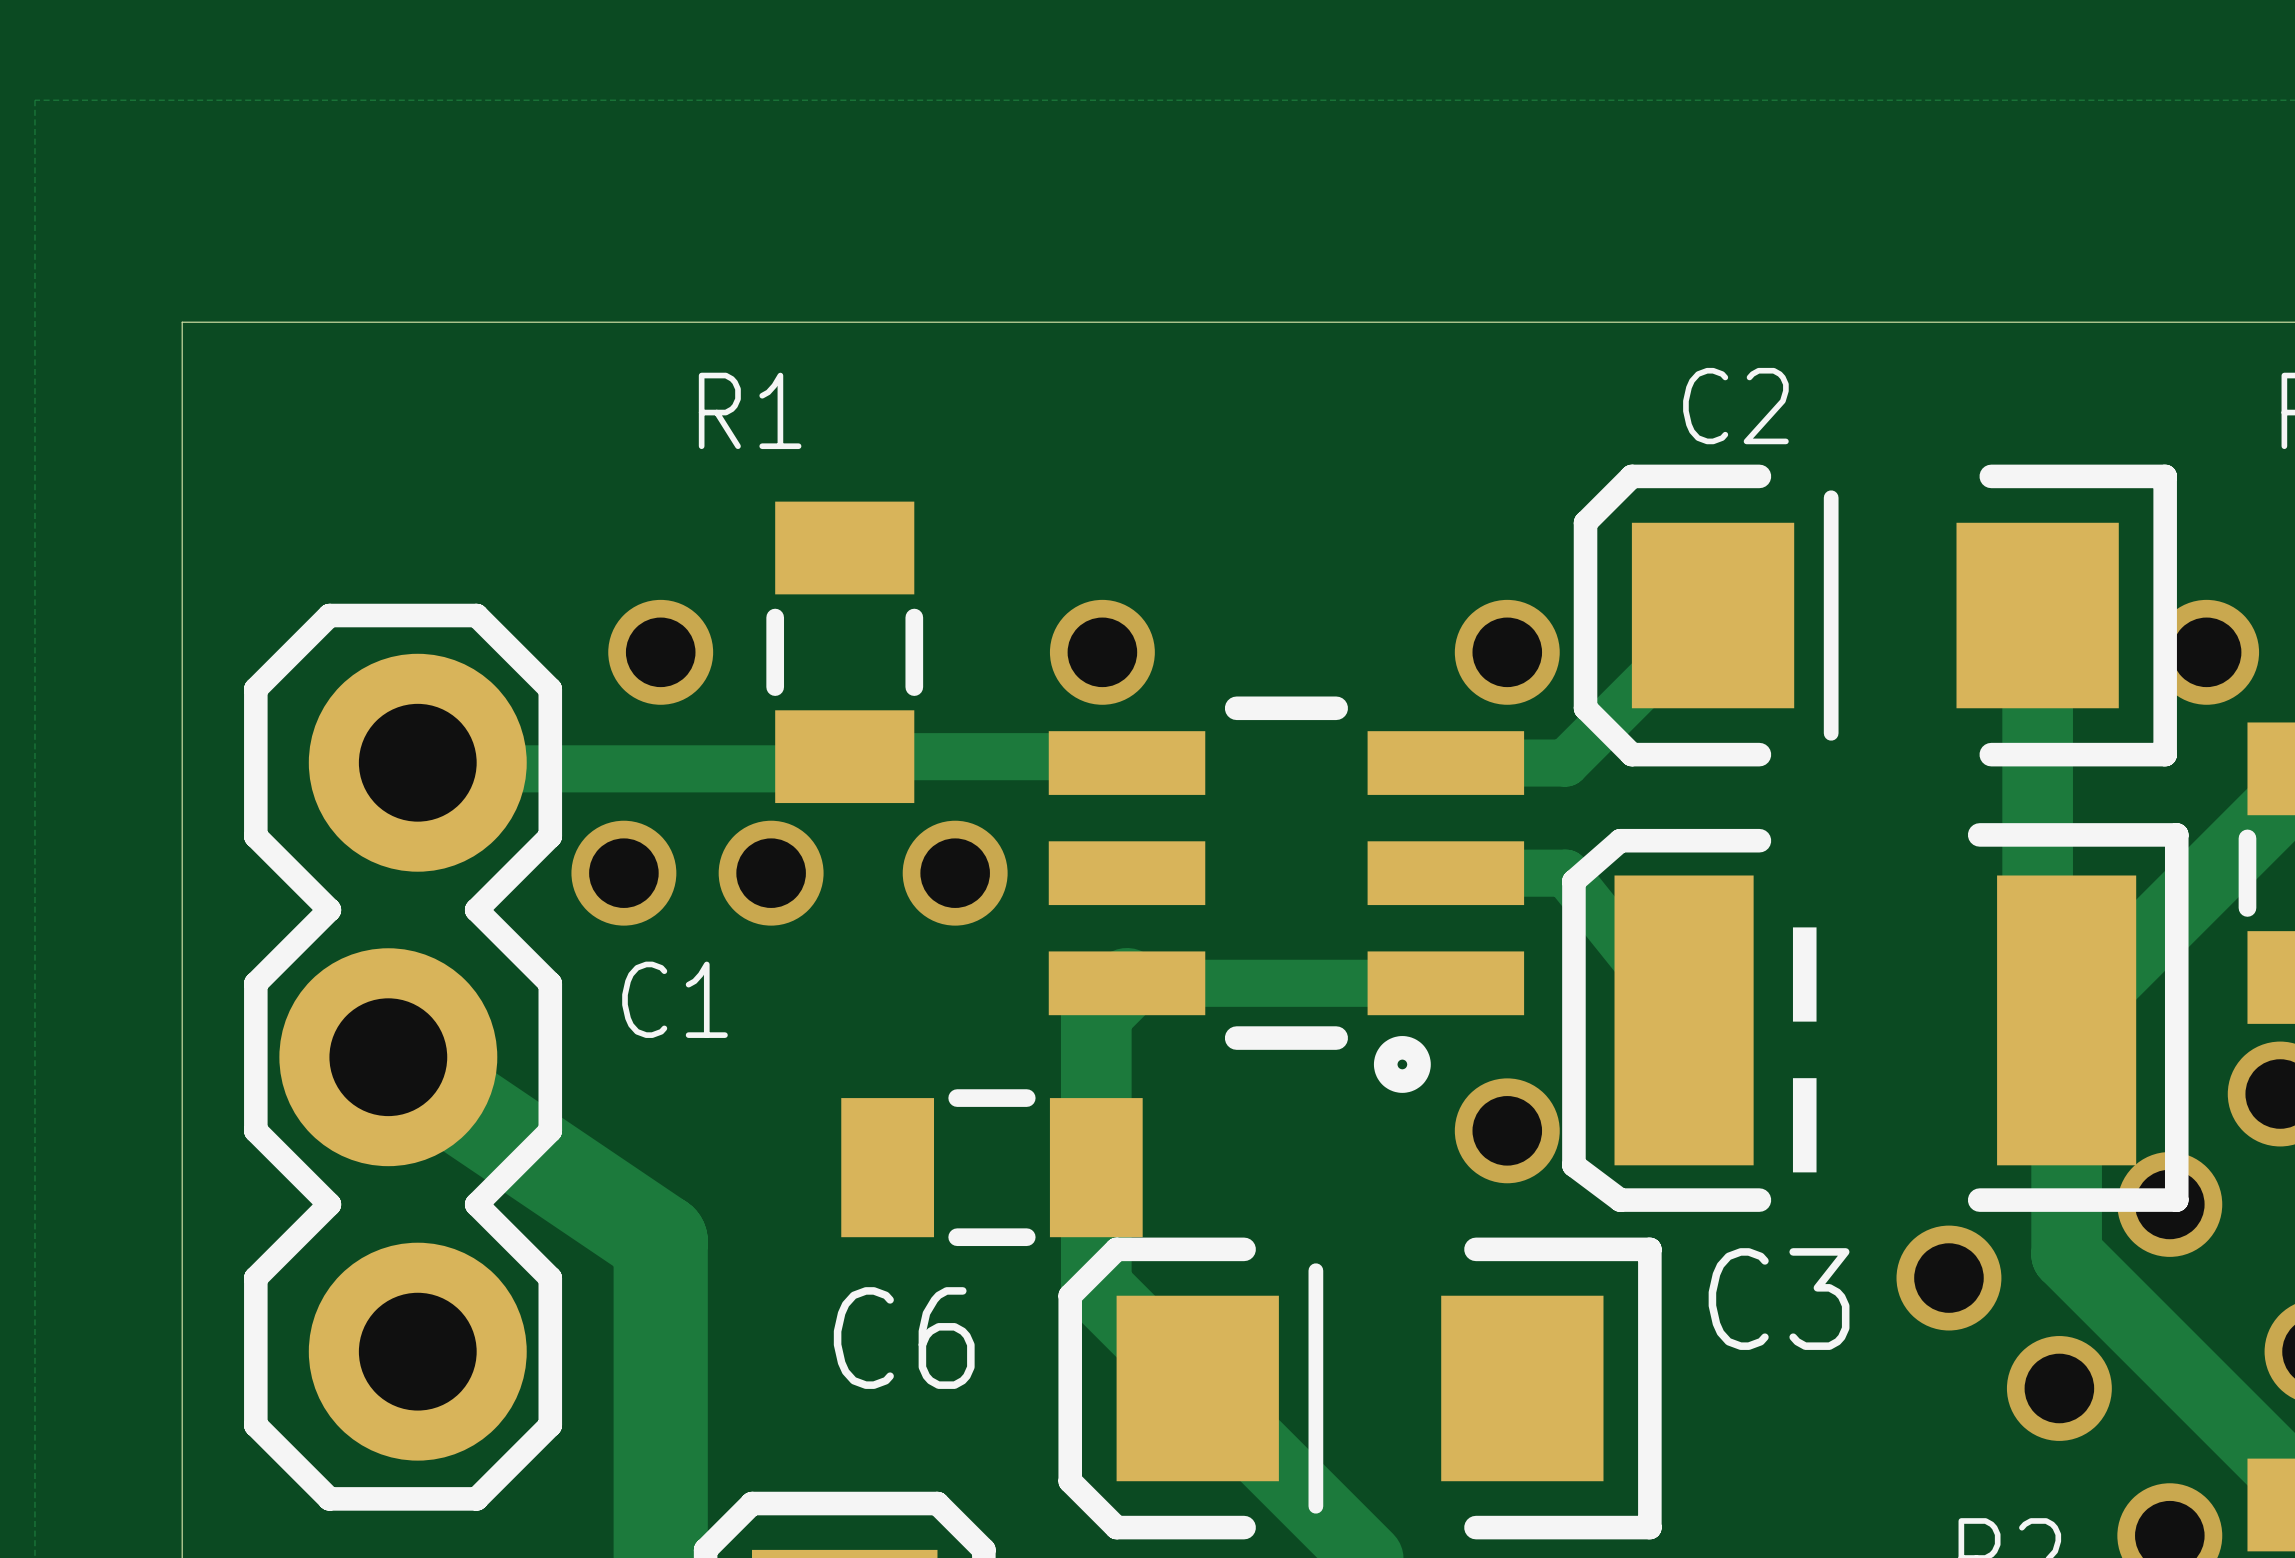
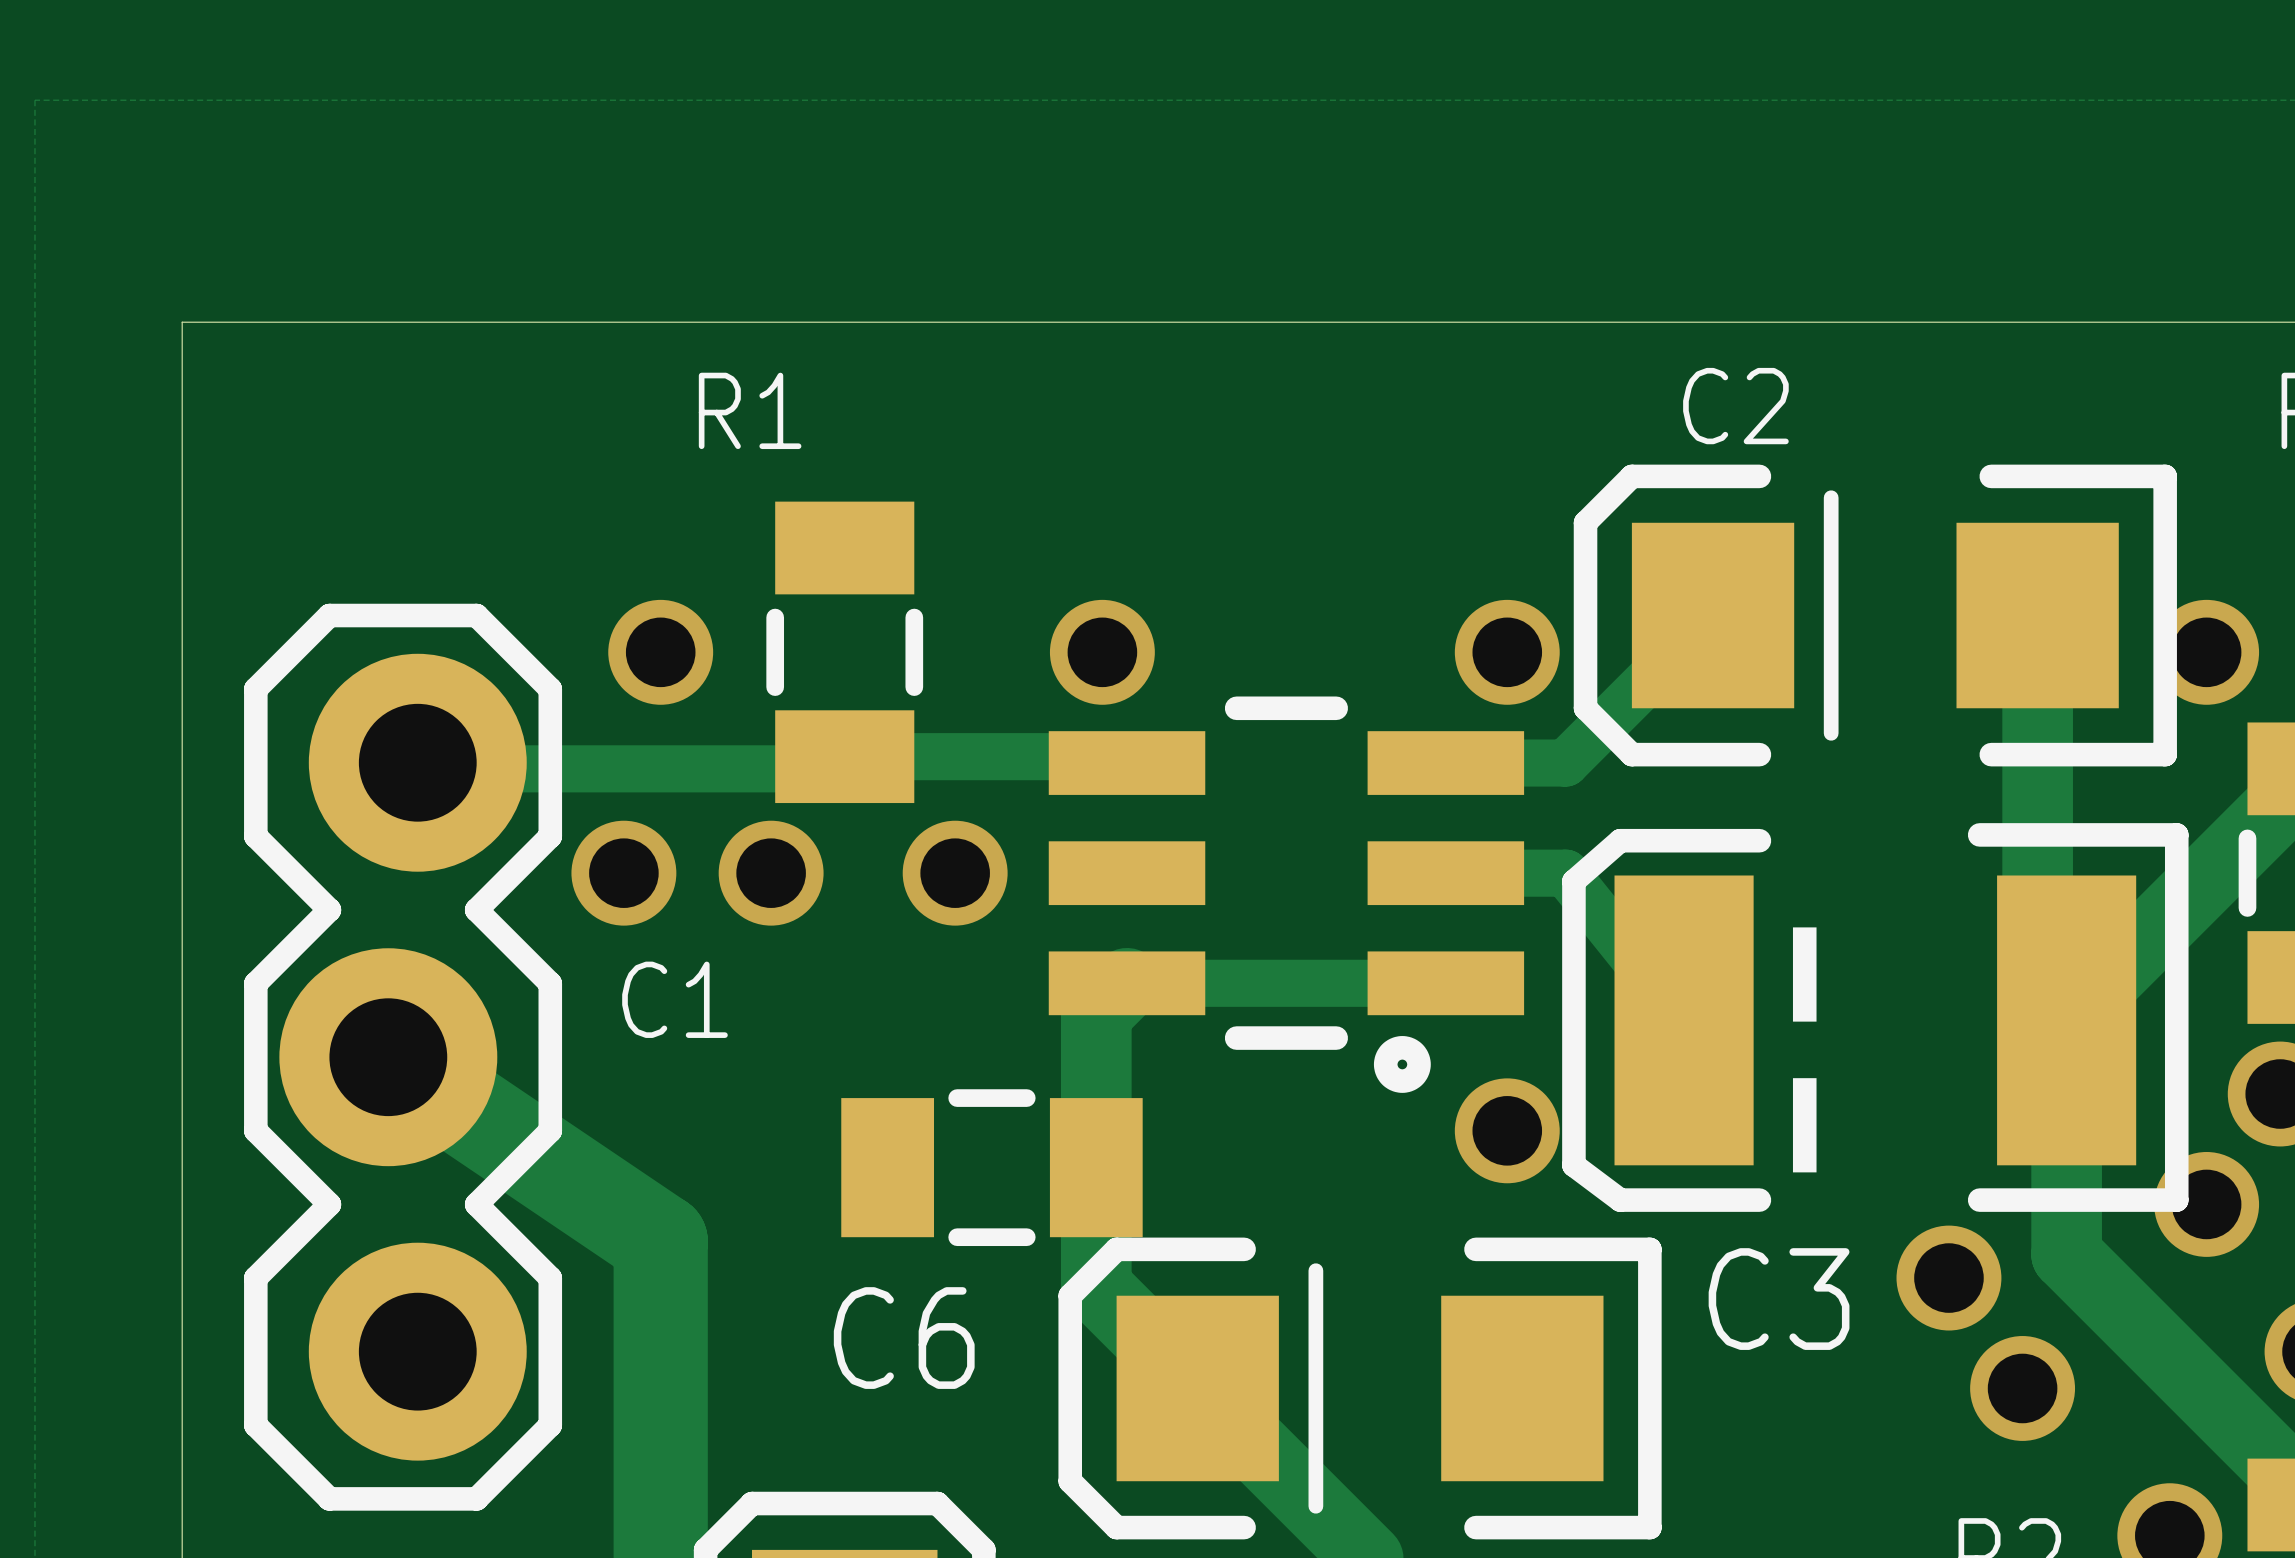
via position: (2169, 1204) -> (2206, 1204)
via position: (2059, 1388) -> (2022, 1388)

